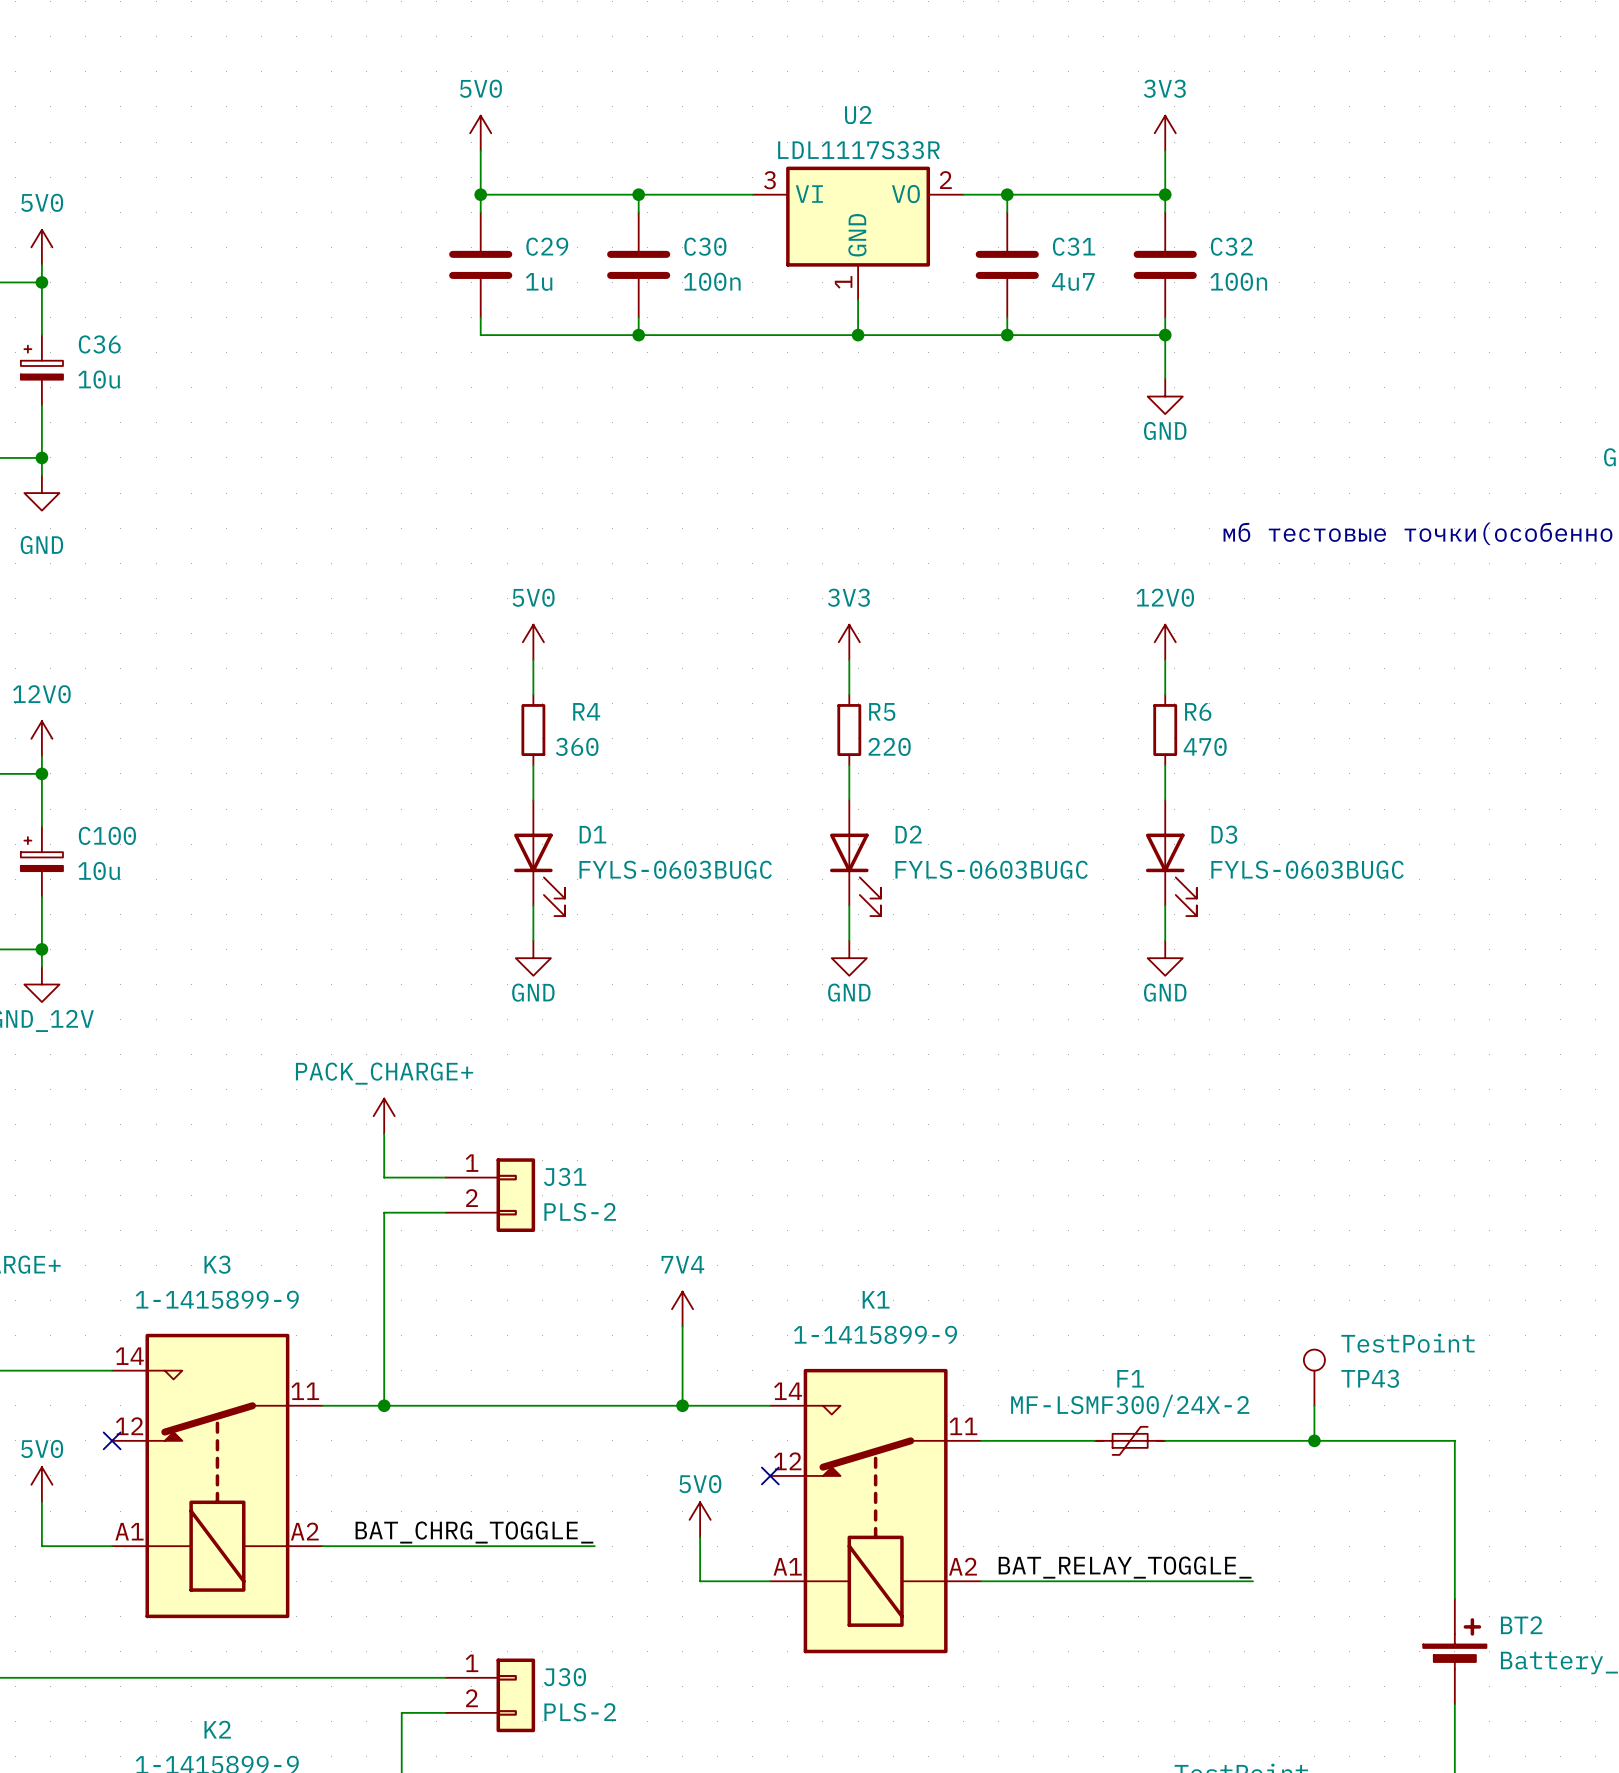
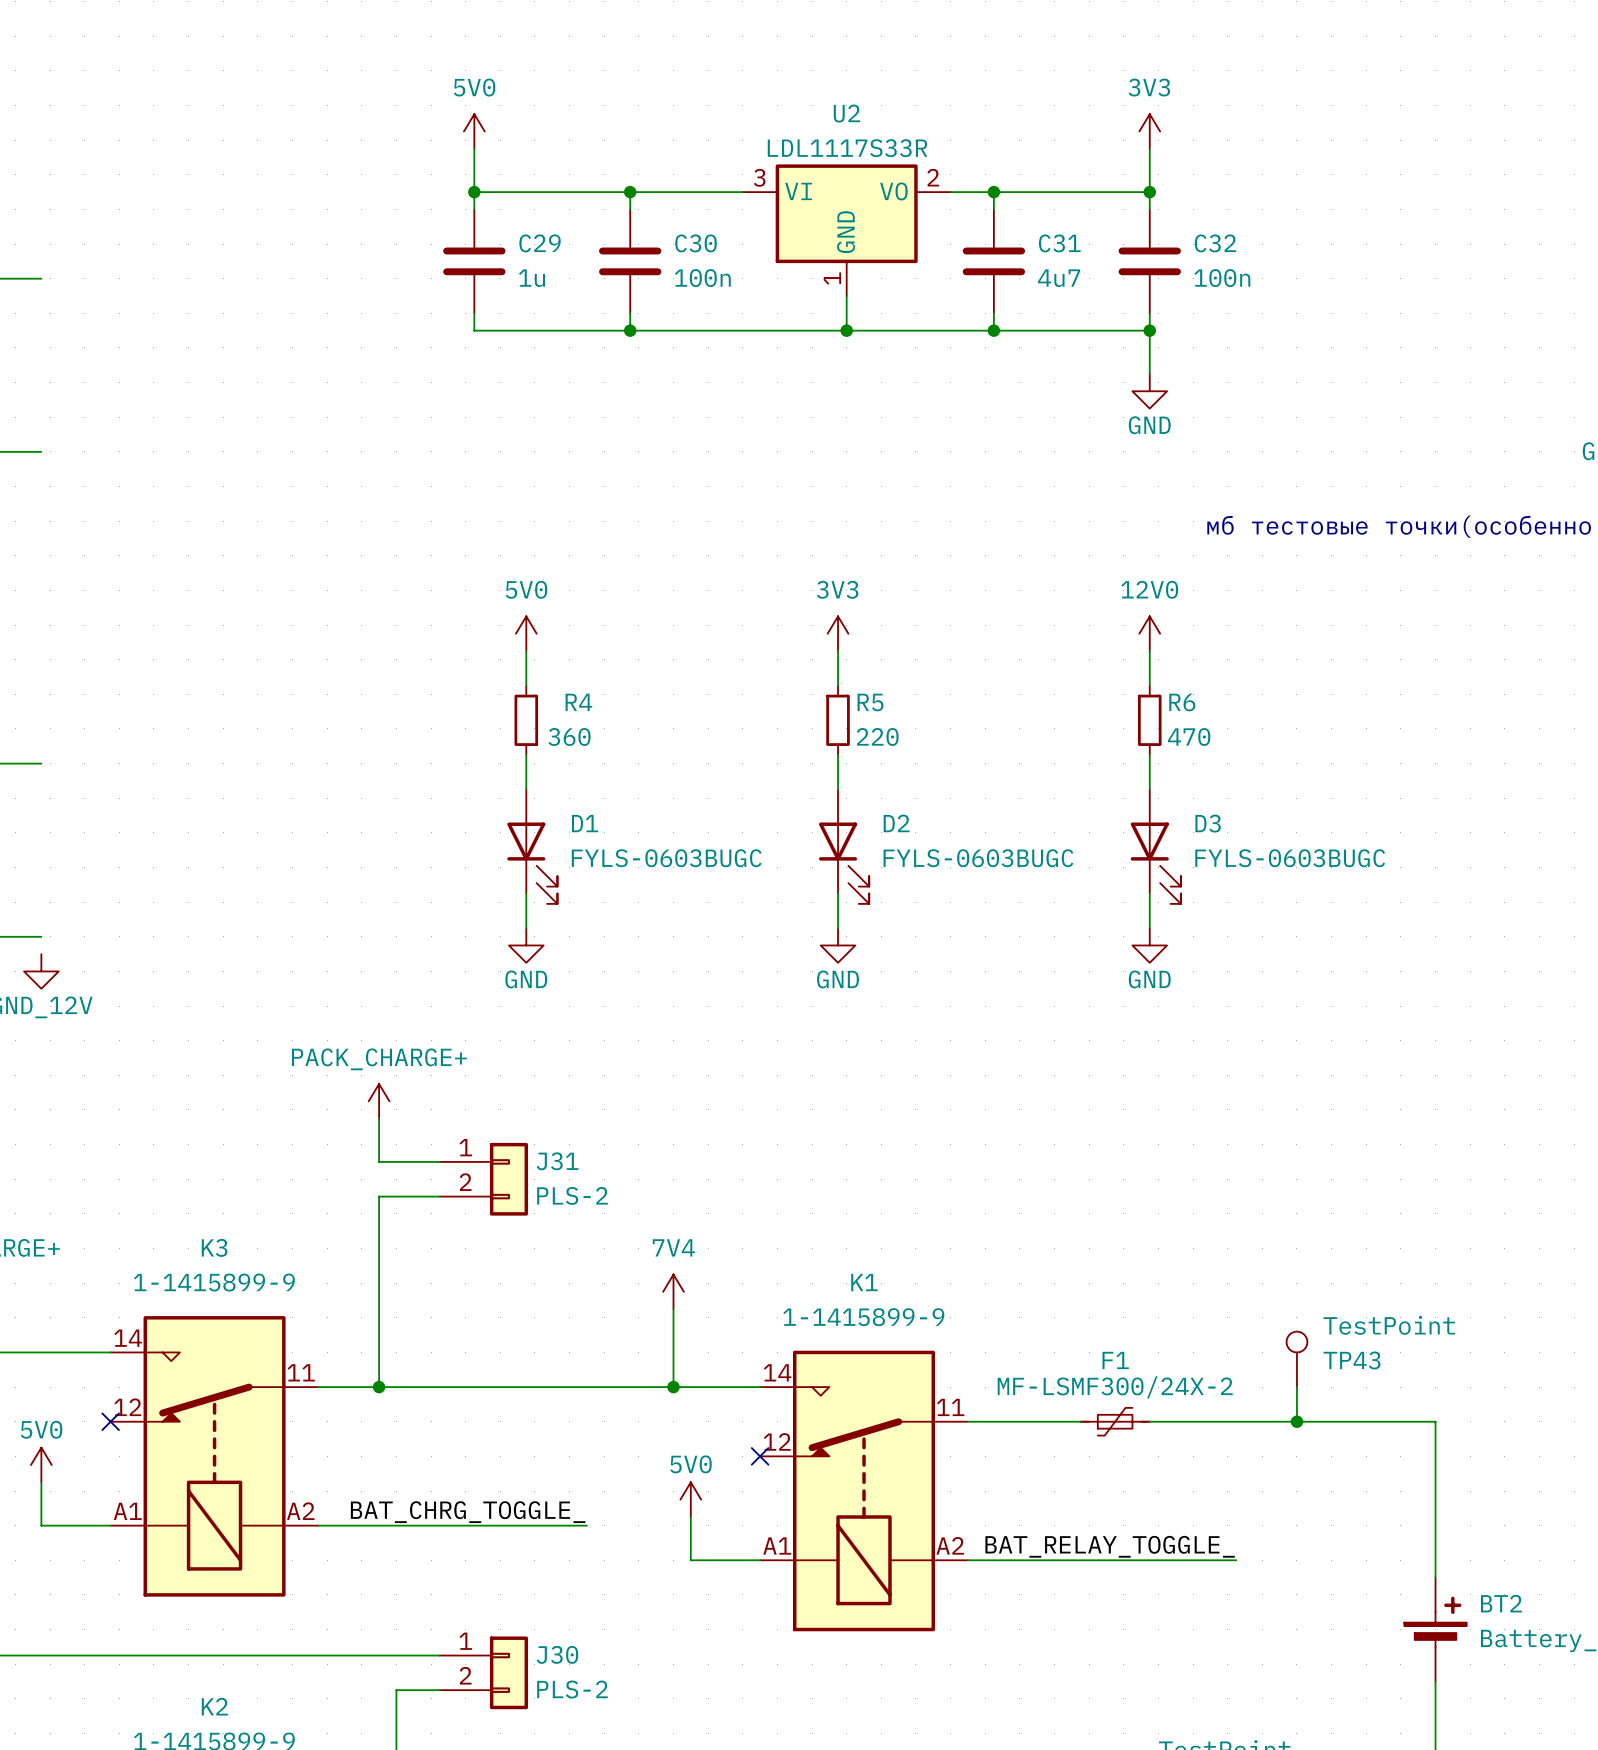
power symbol: 5V0 (41, 247) -> none
wire: (41, 264) (41, 335) -> none
junction: (41, 282) -> none
C36: 10u (41, 370) -> none
wire: (41, 405) (41, 475) -> none
junction: (41, 457) -> none
power symbol: GND (41, 493) -> none
power symbol: 12V0 (41, 738) -> none
wire: (41, 756) (41, 826) -> none
junction: (41, 773) -> none
C100: 10u (41, 861) -> none
wire: (41, 896) (41, 966) -> none
junction: (41, 949) -> none

